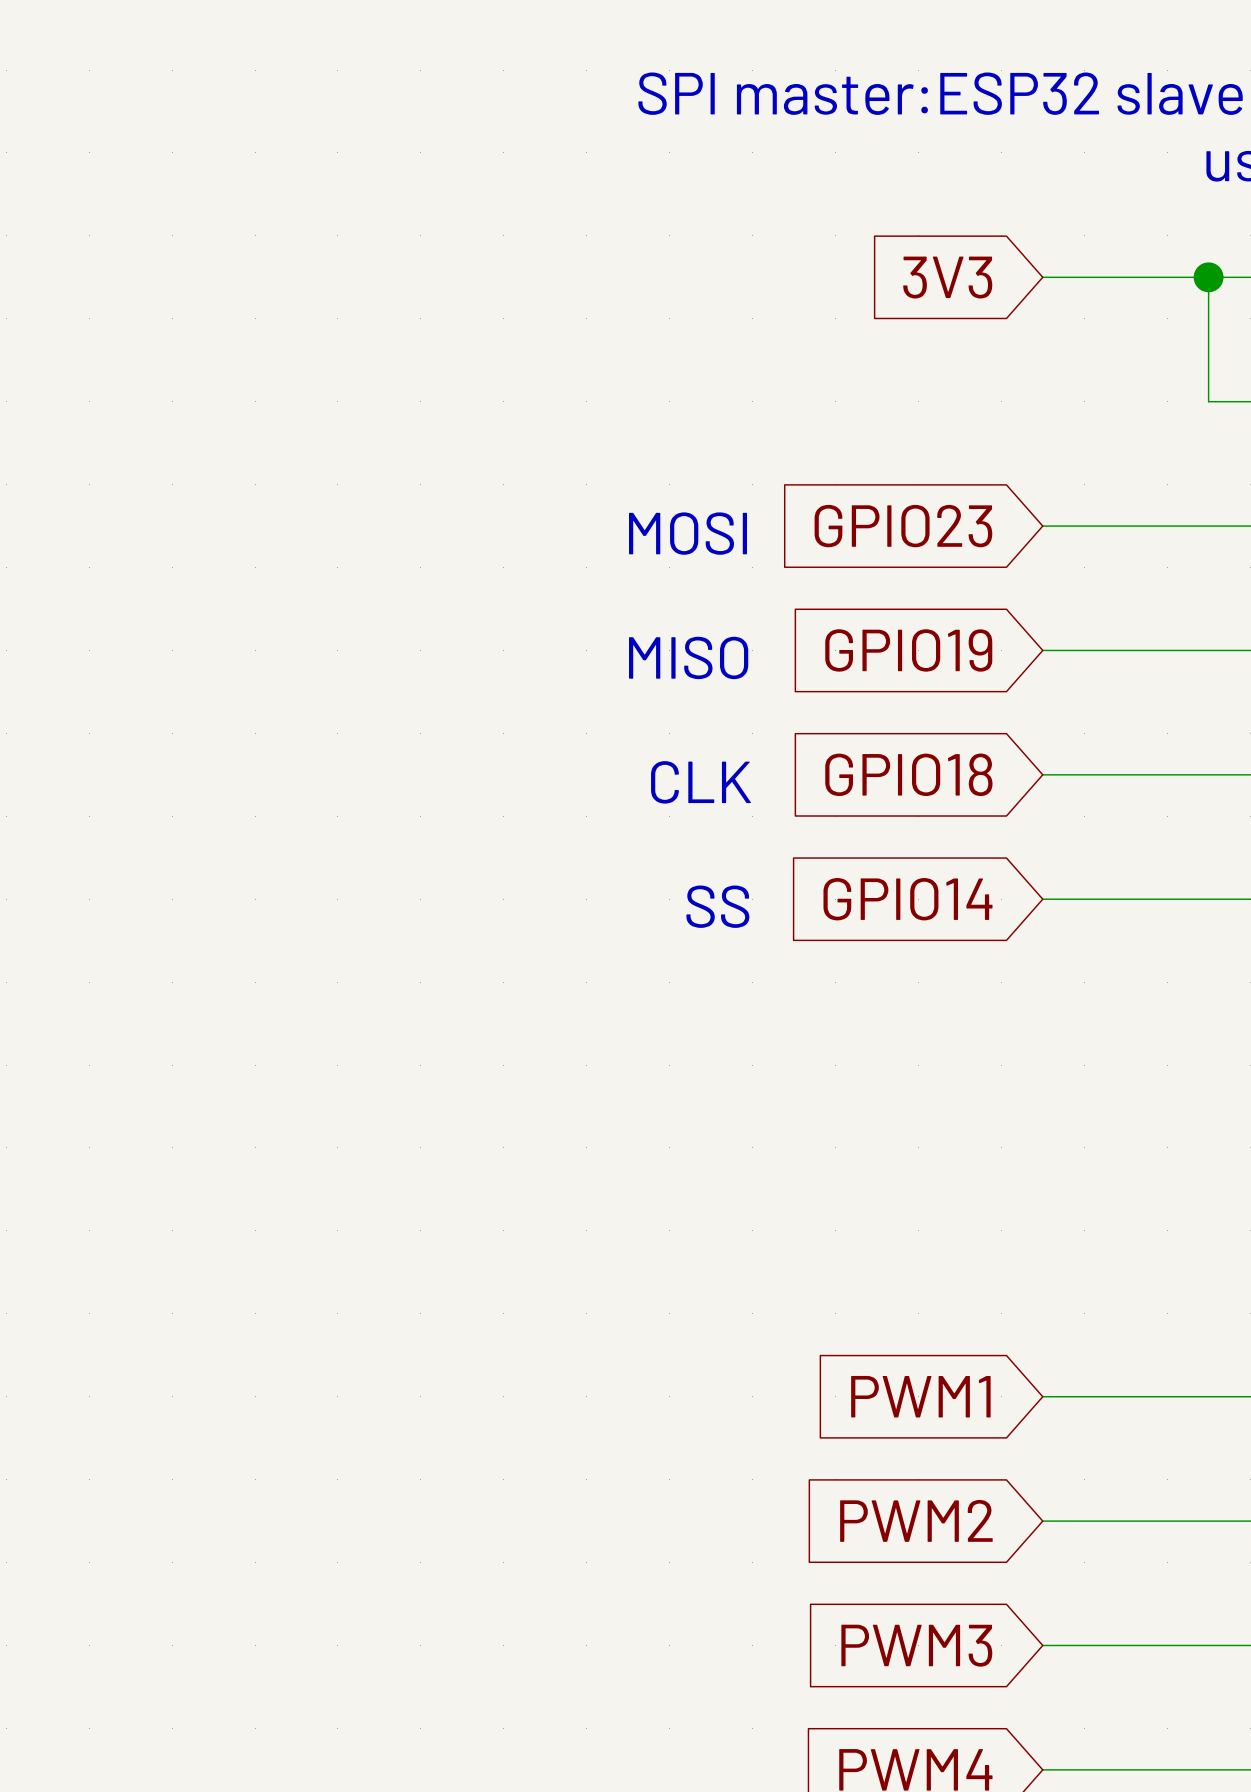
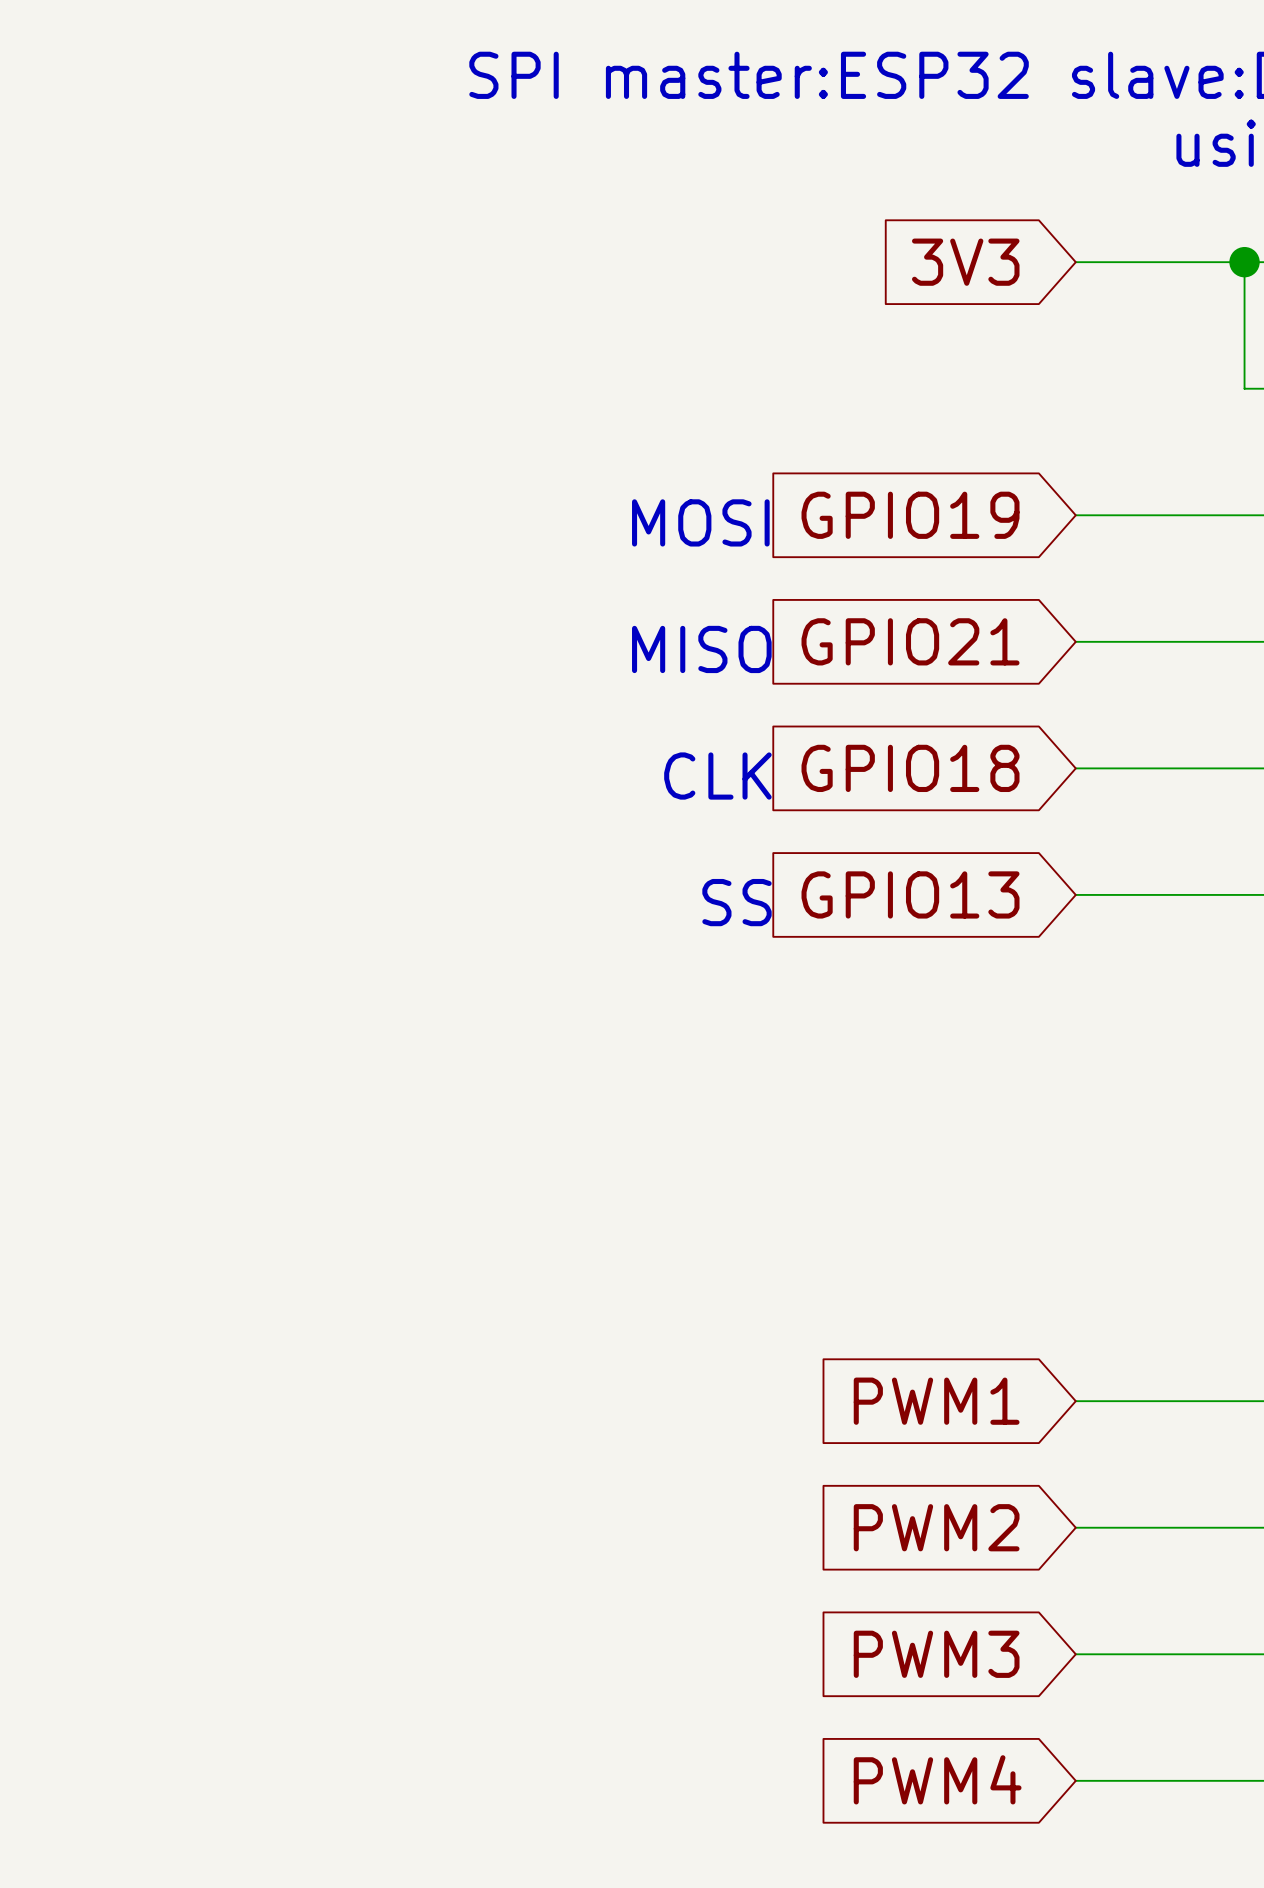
global label: GPIO23 (903, 526) -> GPIO19 (910, 515)
global label: GPIO19 (908, 650) -> GPIO21 (910, 641)
global label: GPIO14 (908, 899) -> GPIO13 (910, 894)

